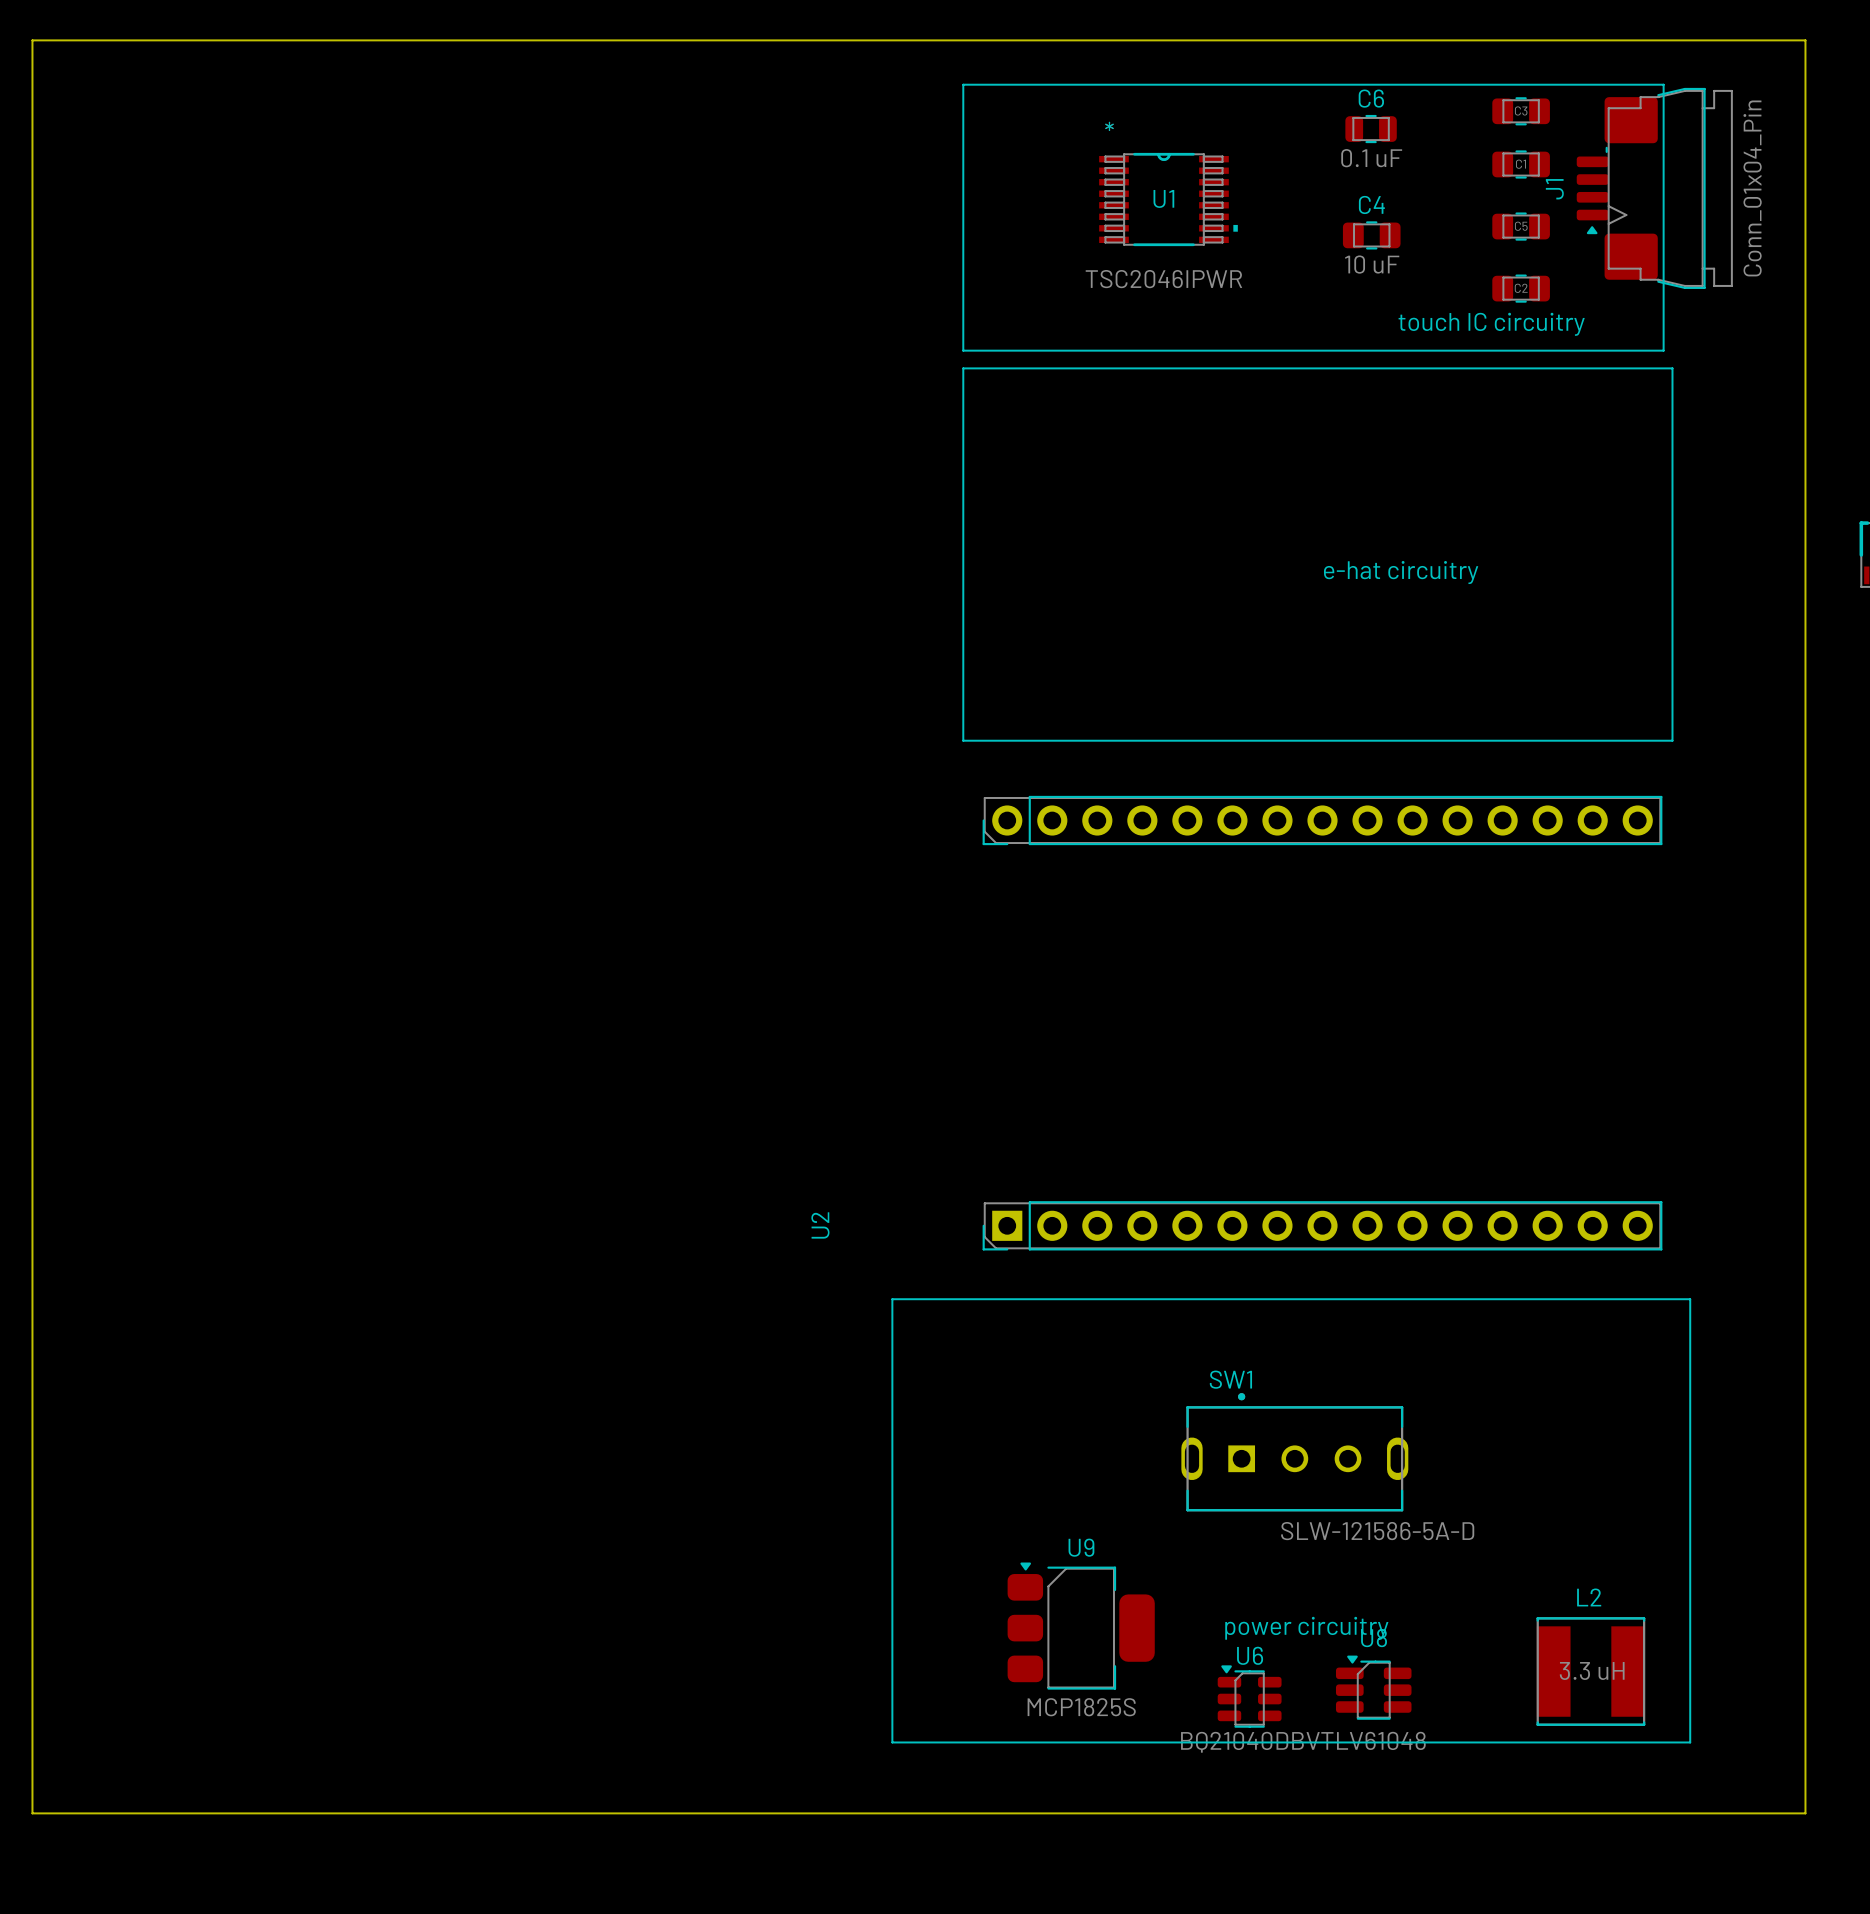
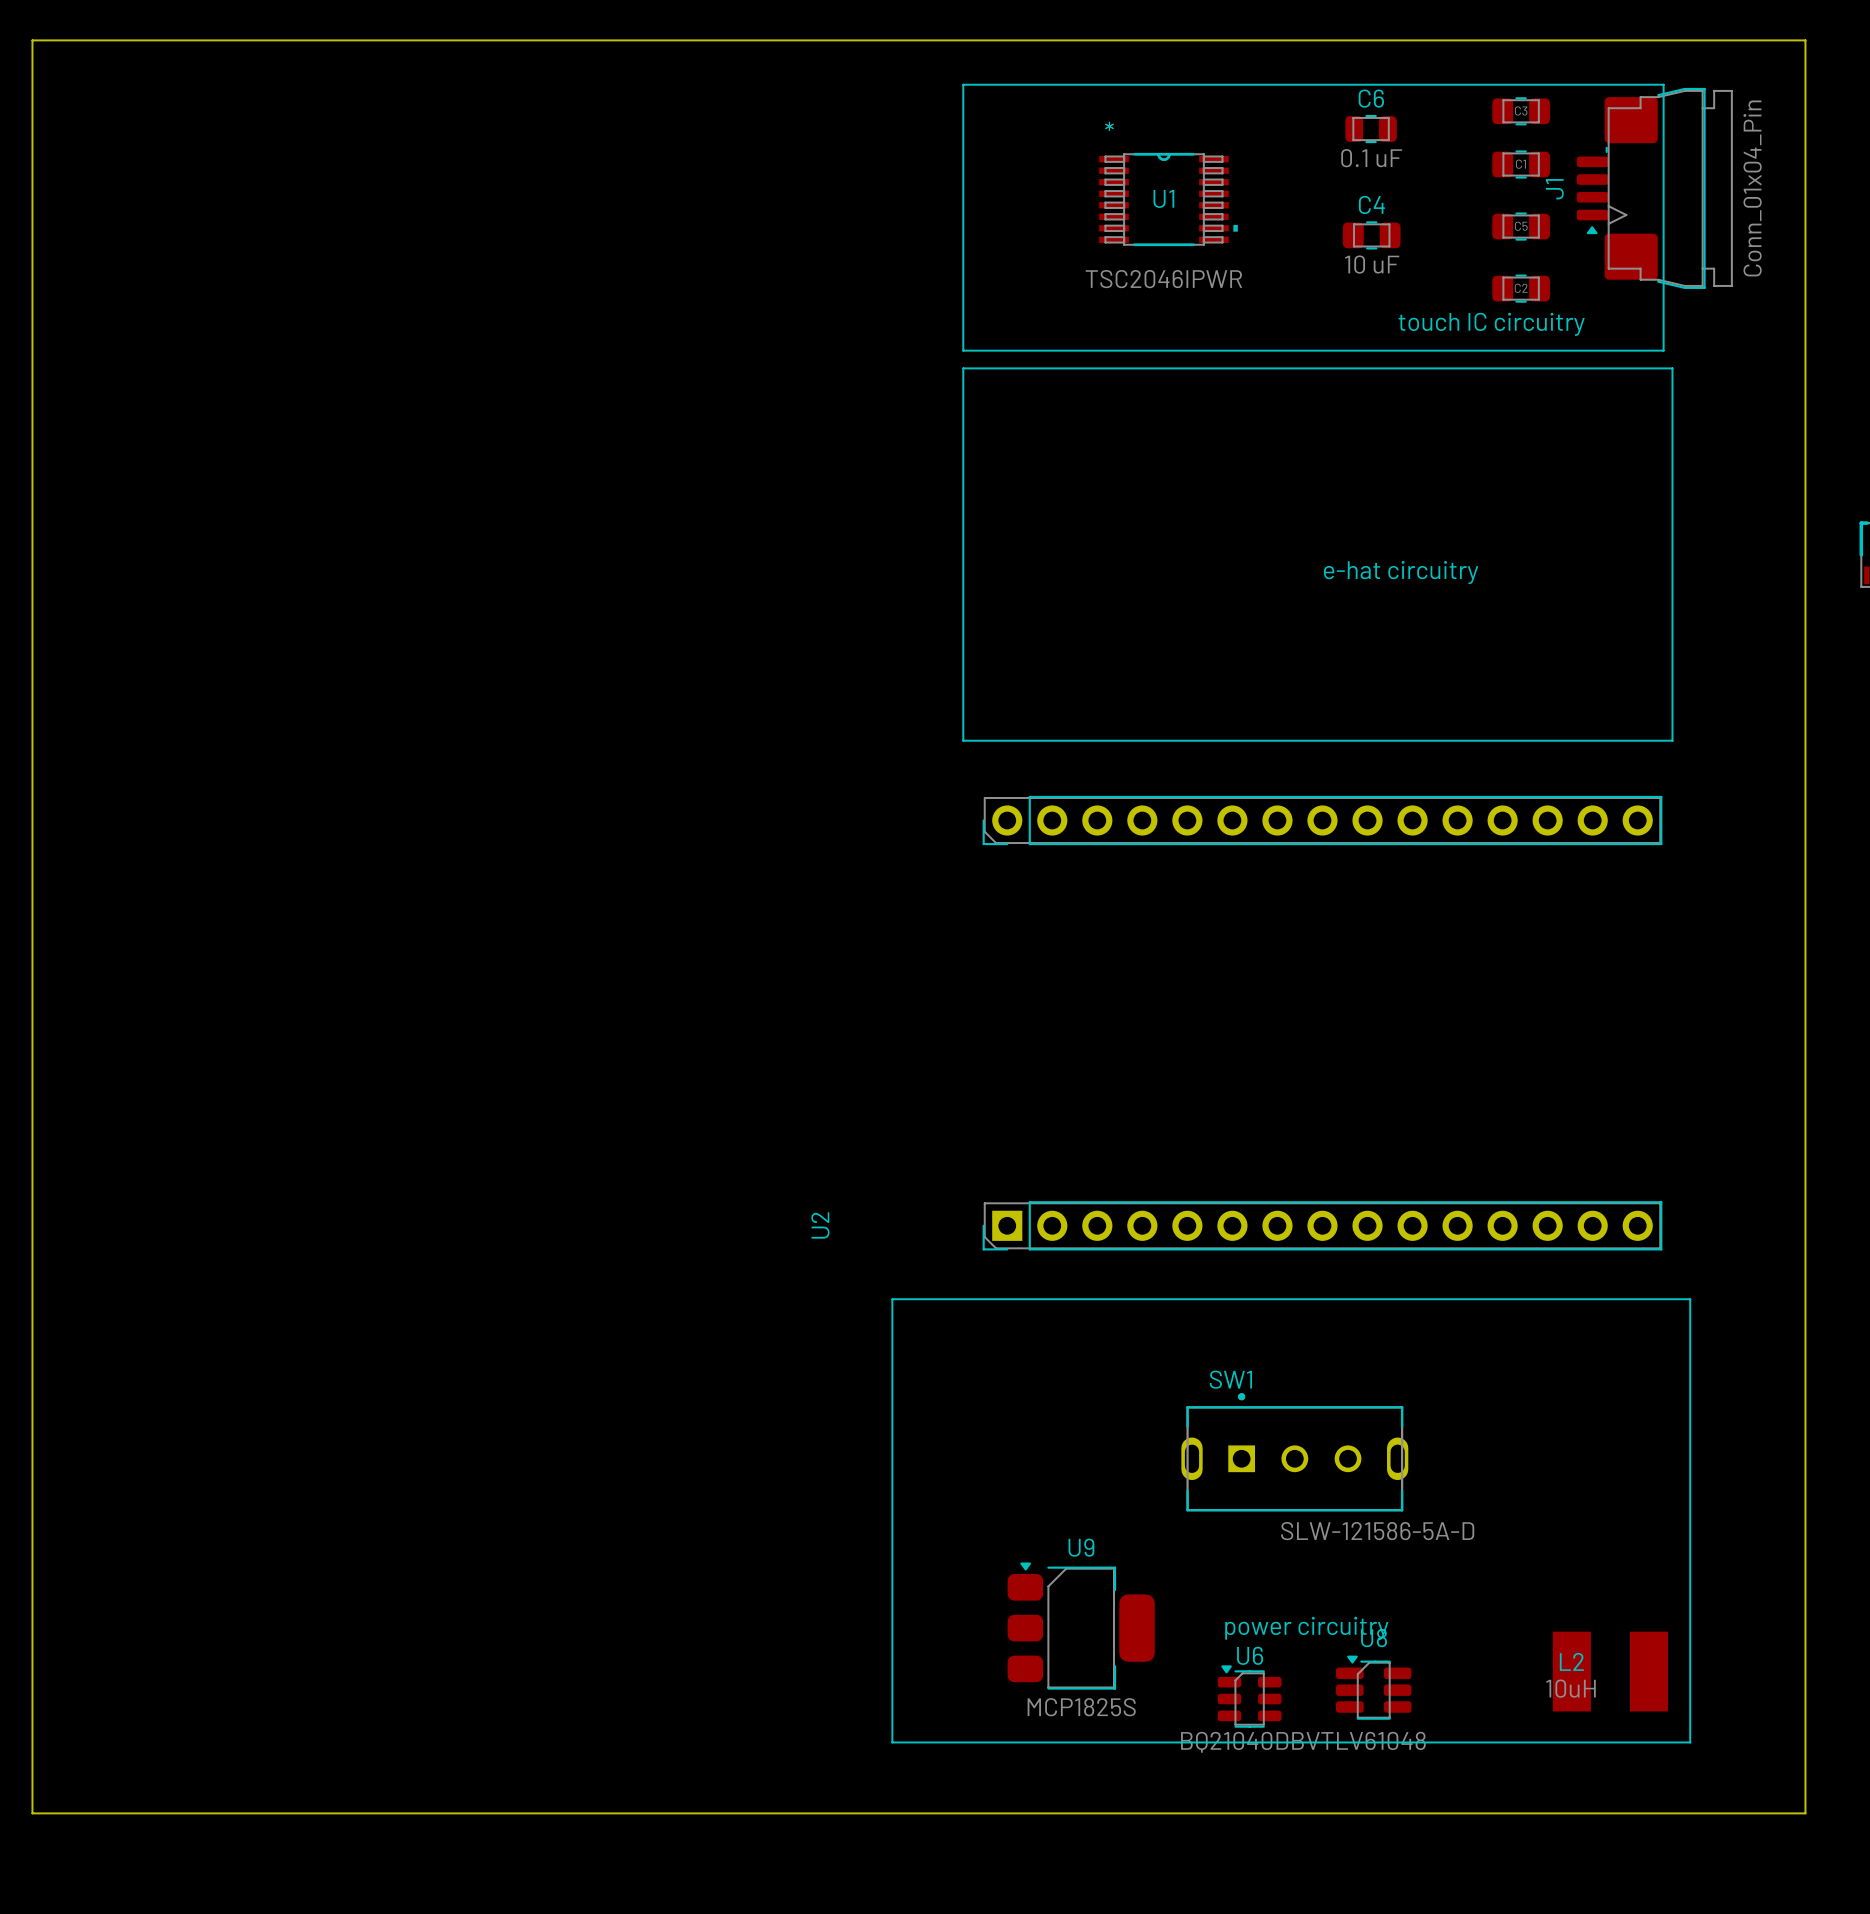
L2 name position: L2 (1589, 1597) -> L2 (1571, 1661)
L2 footprint: [1536, 1617, 1646, 1726] -> [1552, 1631, 1669, 1712]
L2 value: 3.3 uH (1592, 1670) -> 10uH (1571, 1688)

